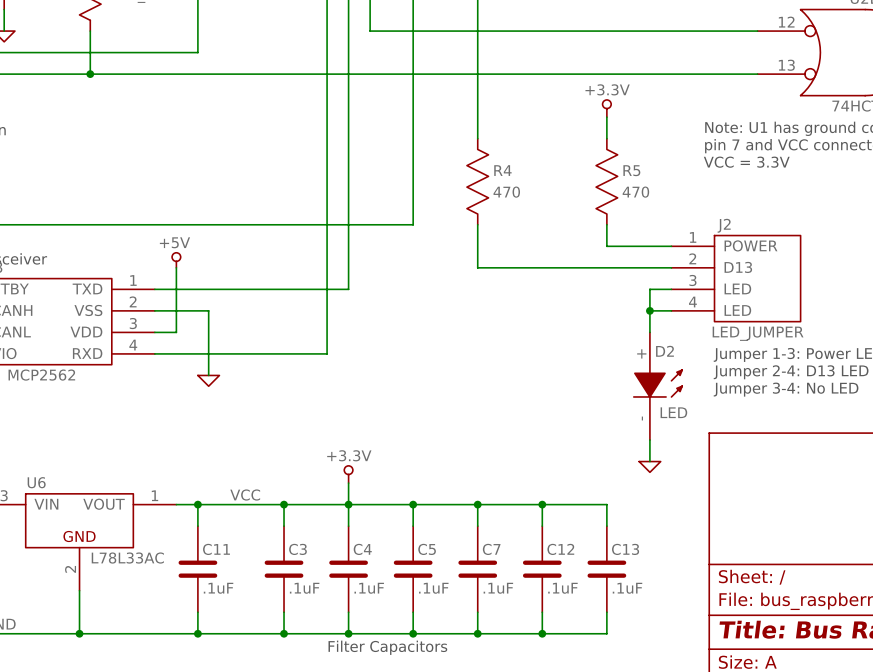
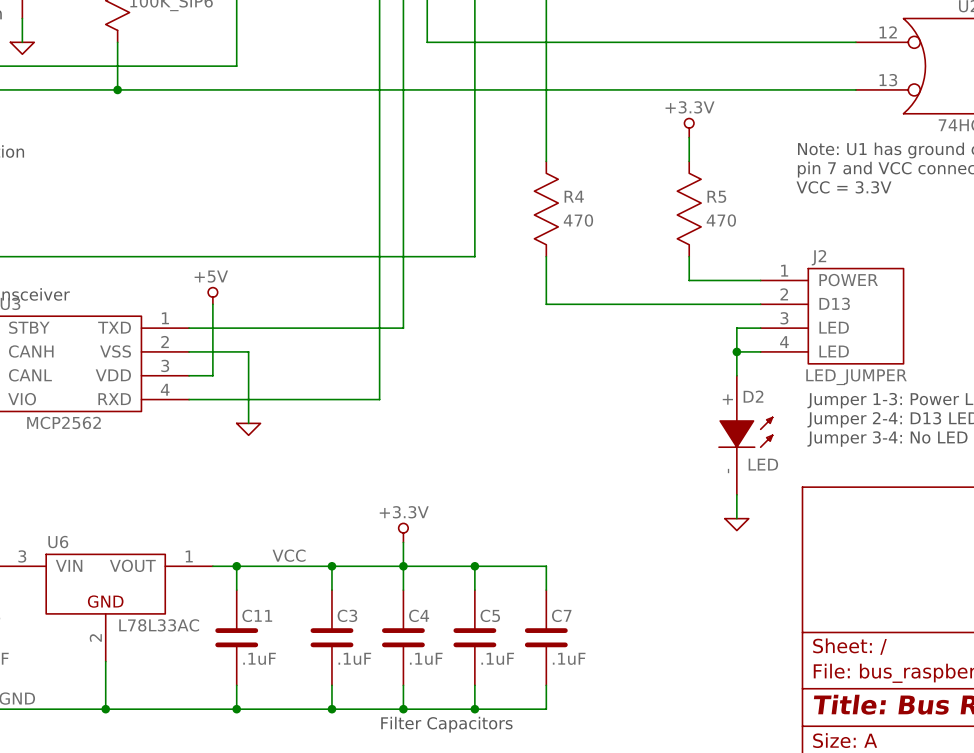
wire: (477, 504) (606, 504) (606, 526) -> none
junction: (477, 504) -> none
wire: (542, 504) (542, 526) -> none
junction: (542, 504) -> none
C12: .1uF (542, 569) -> none
C13: .1uF (606, 569) -> none
wire: (542, 612) (542, 633) -> none
wire: (606, 612) (606, 633) (477, 633) -> none
junction: (477, 633) -> none
junction: (542, 633) -> none

